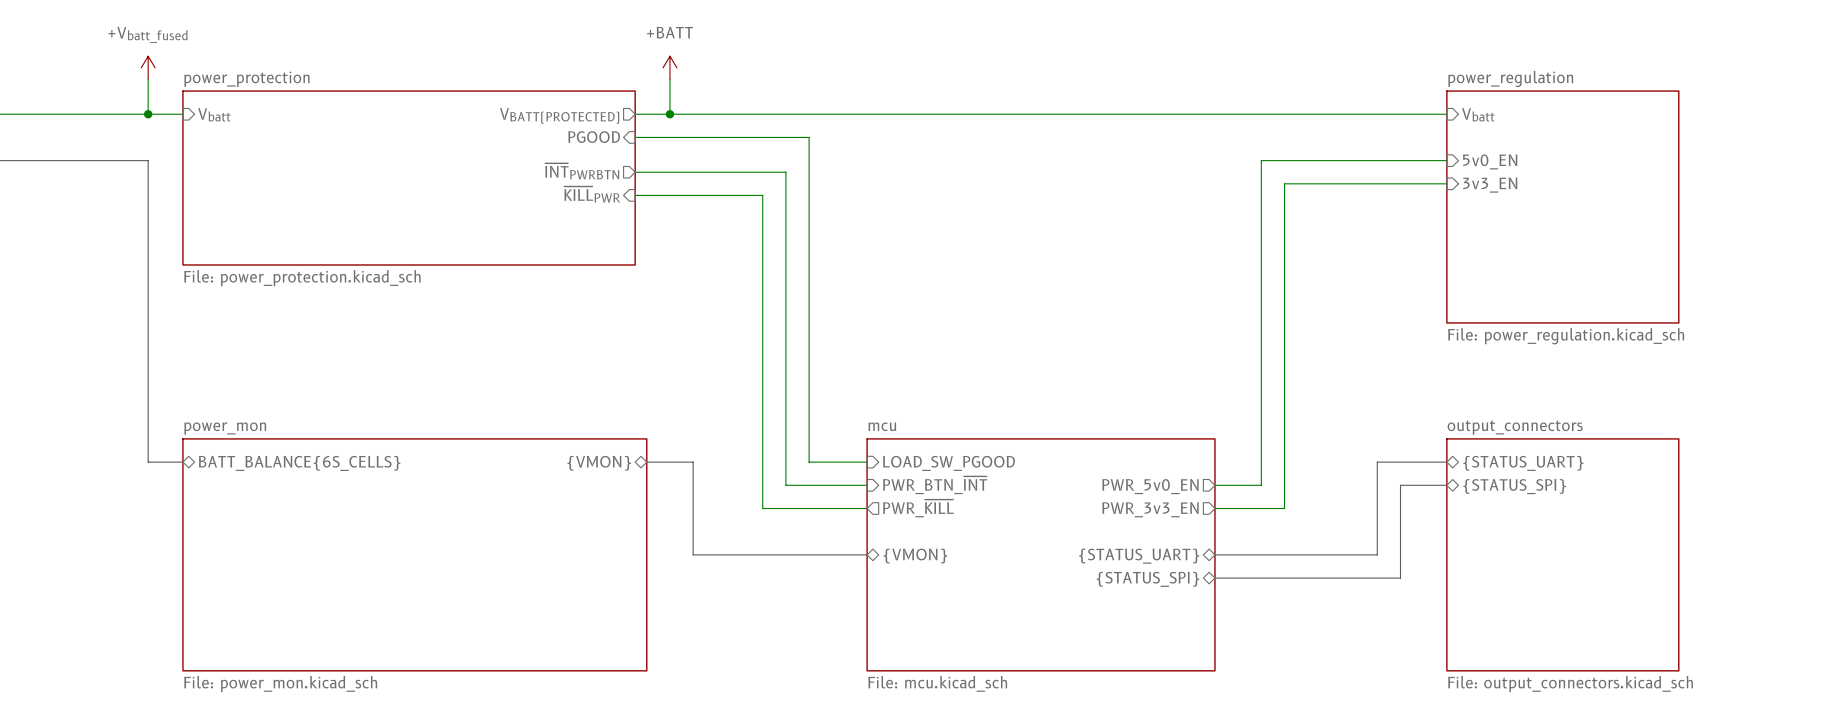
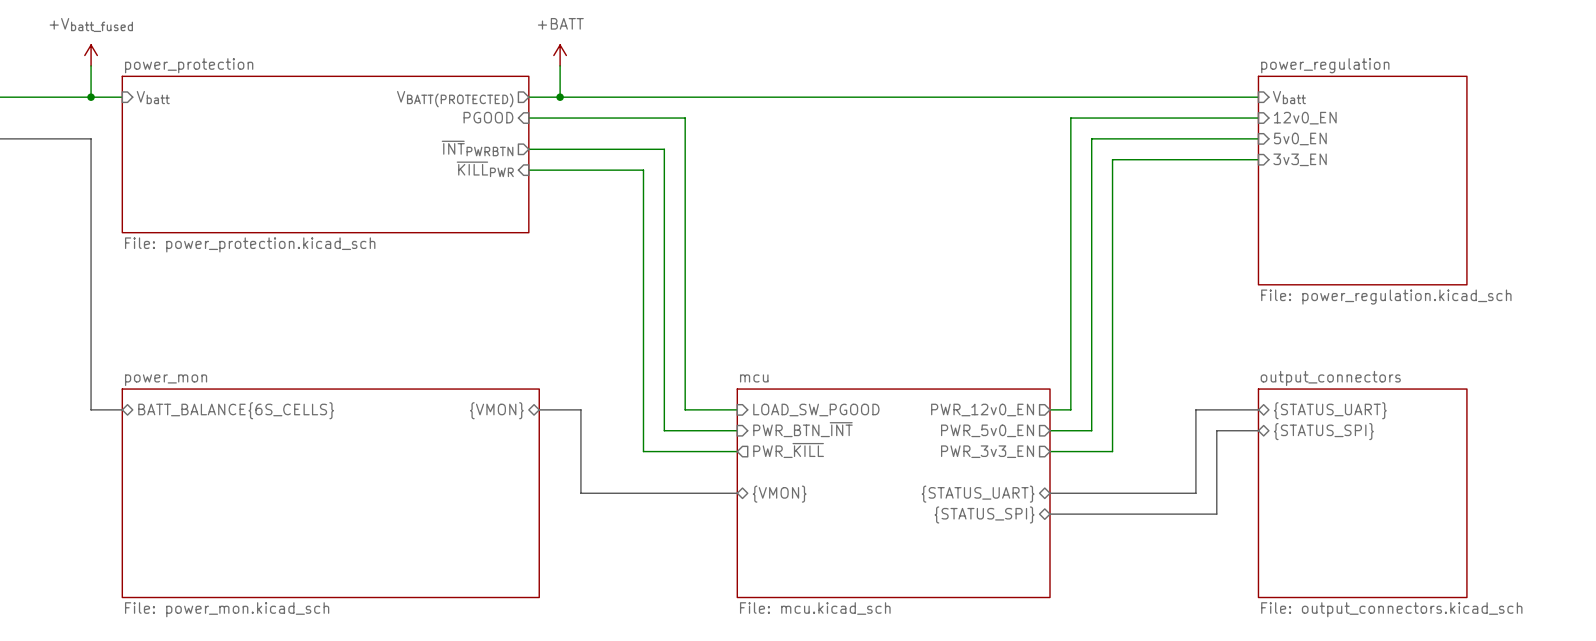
wire: none -> (1258, 118) (1070, 118) (1070, 409) (1050, 409)
sheet pin: none -> 12v0_EN (1305, 118)
sheet pin: none -> PWR_12v0_EN (982, 409)

